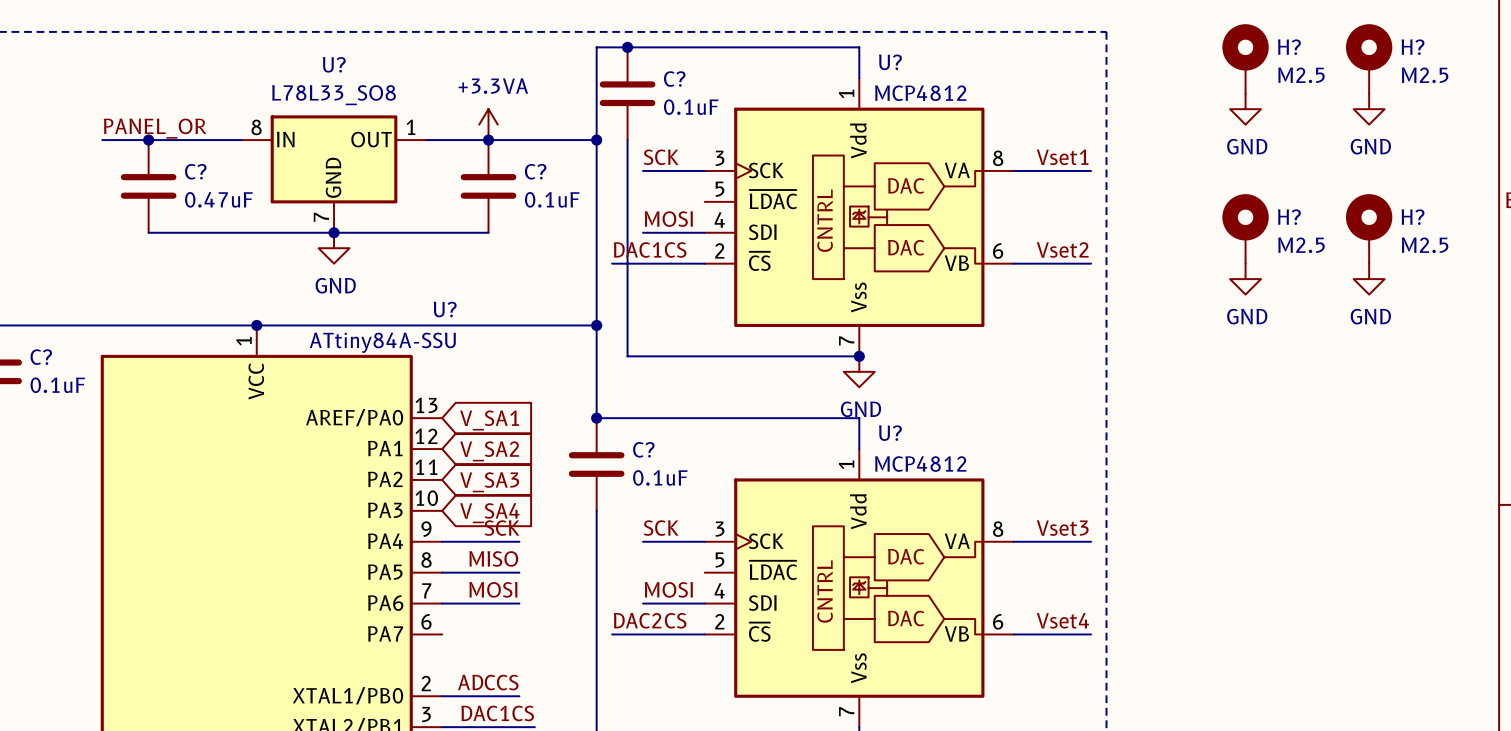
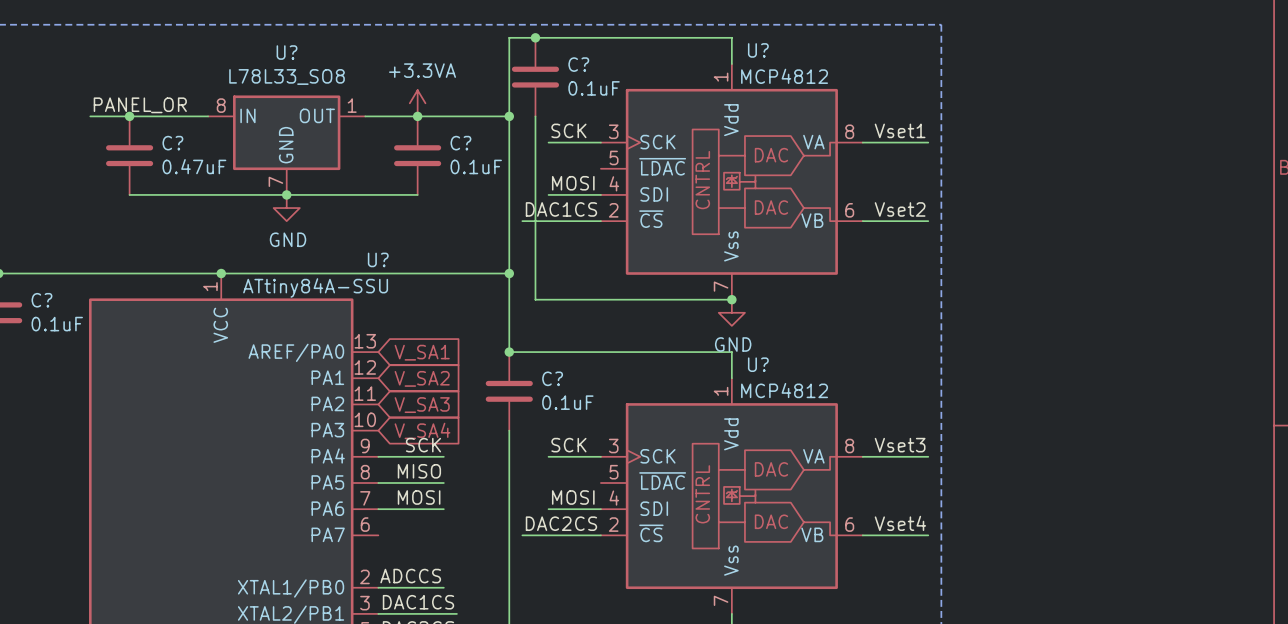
H?: M2.5 (1245, 58) -> none
H?: M2.5 (1369, 58) -> none
power symbol: GND (1245, 109) -> none
power symbol: GND (1369, 109) -> none
H?: M2.5 (1245, 228) -> none
H?: M2.5 (1369, 228) -> none
power symbol: GND (1245, 279) -> none
power symbol: GND (1369, 279) -> none

